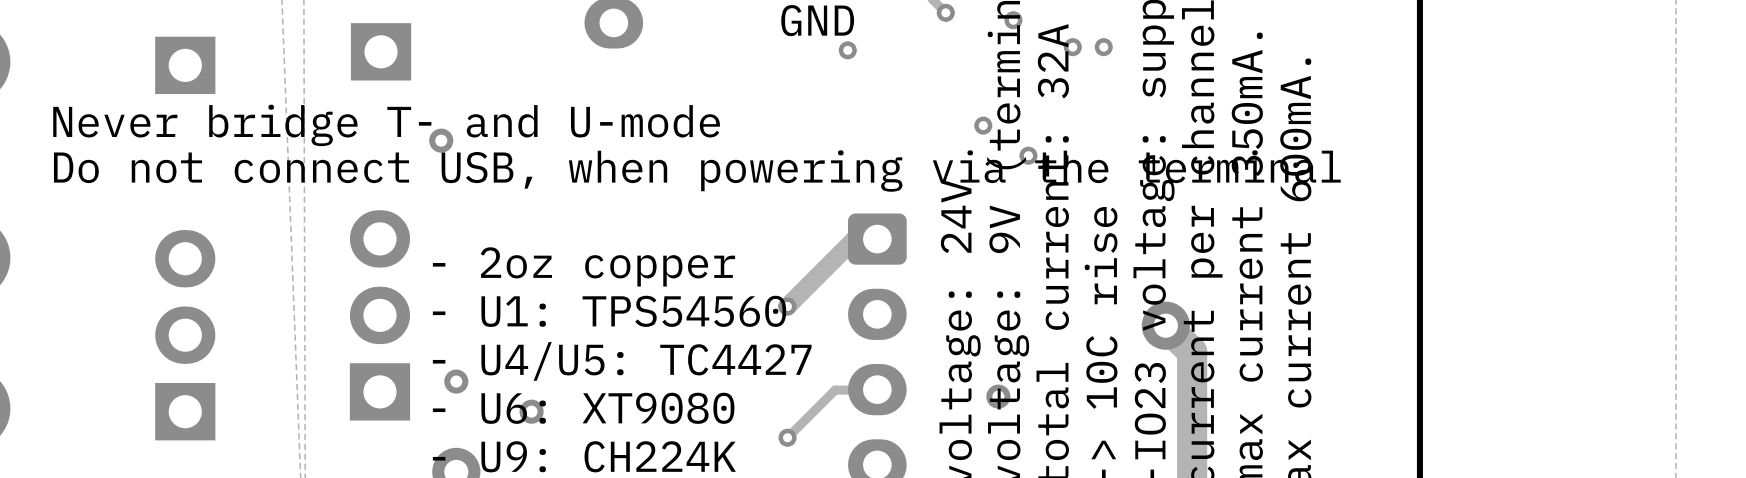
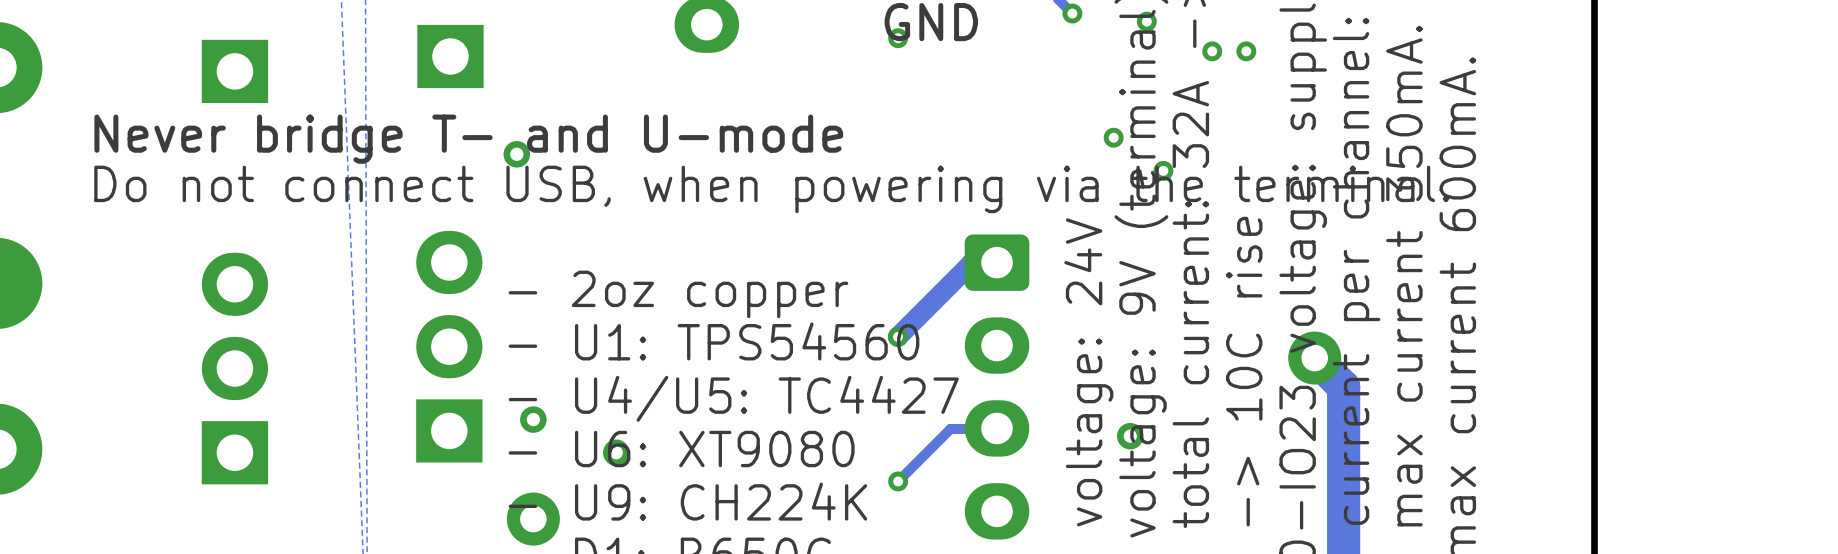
via: none -> (898, 38)
via: (847, 50) -> none
text: Do not connect USB, when powering via the terminal (697, 171) -> Do not connect USB, when powering via the terminal. (771, 189)

